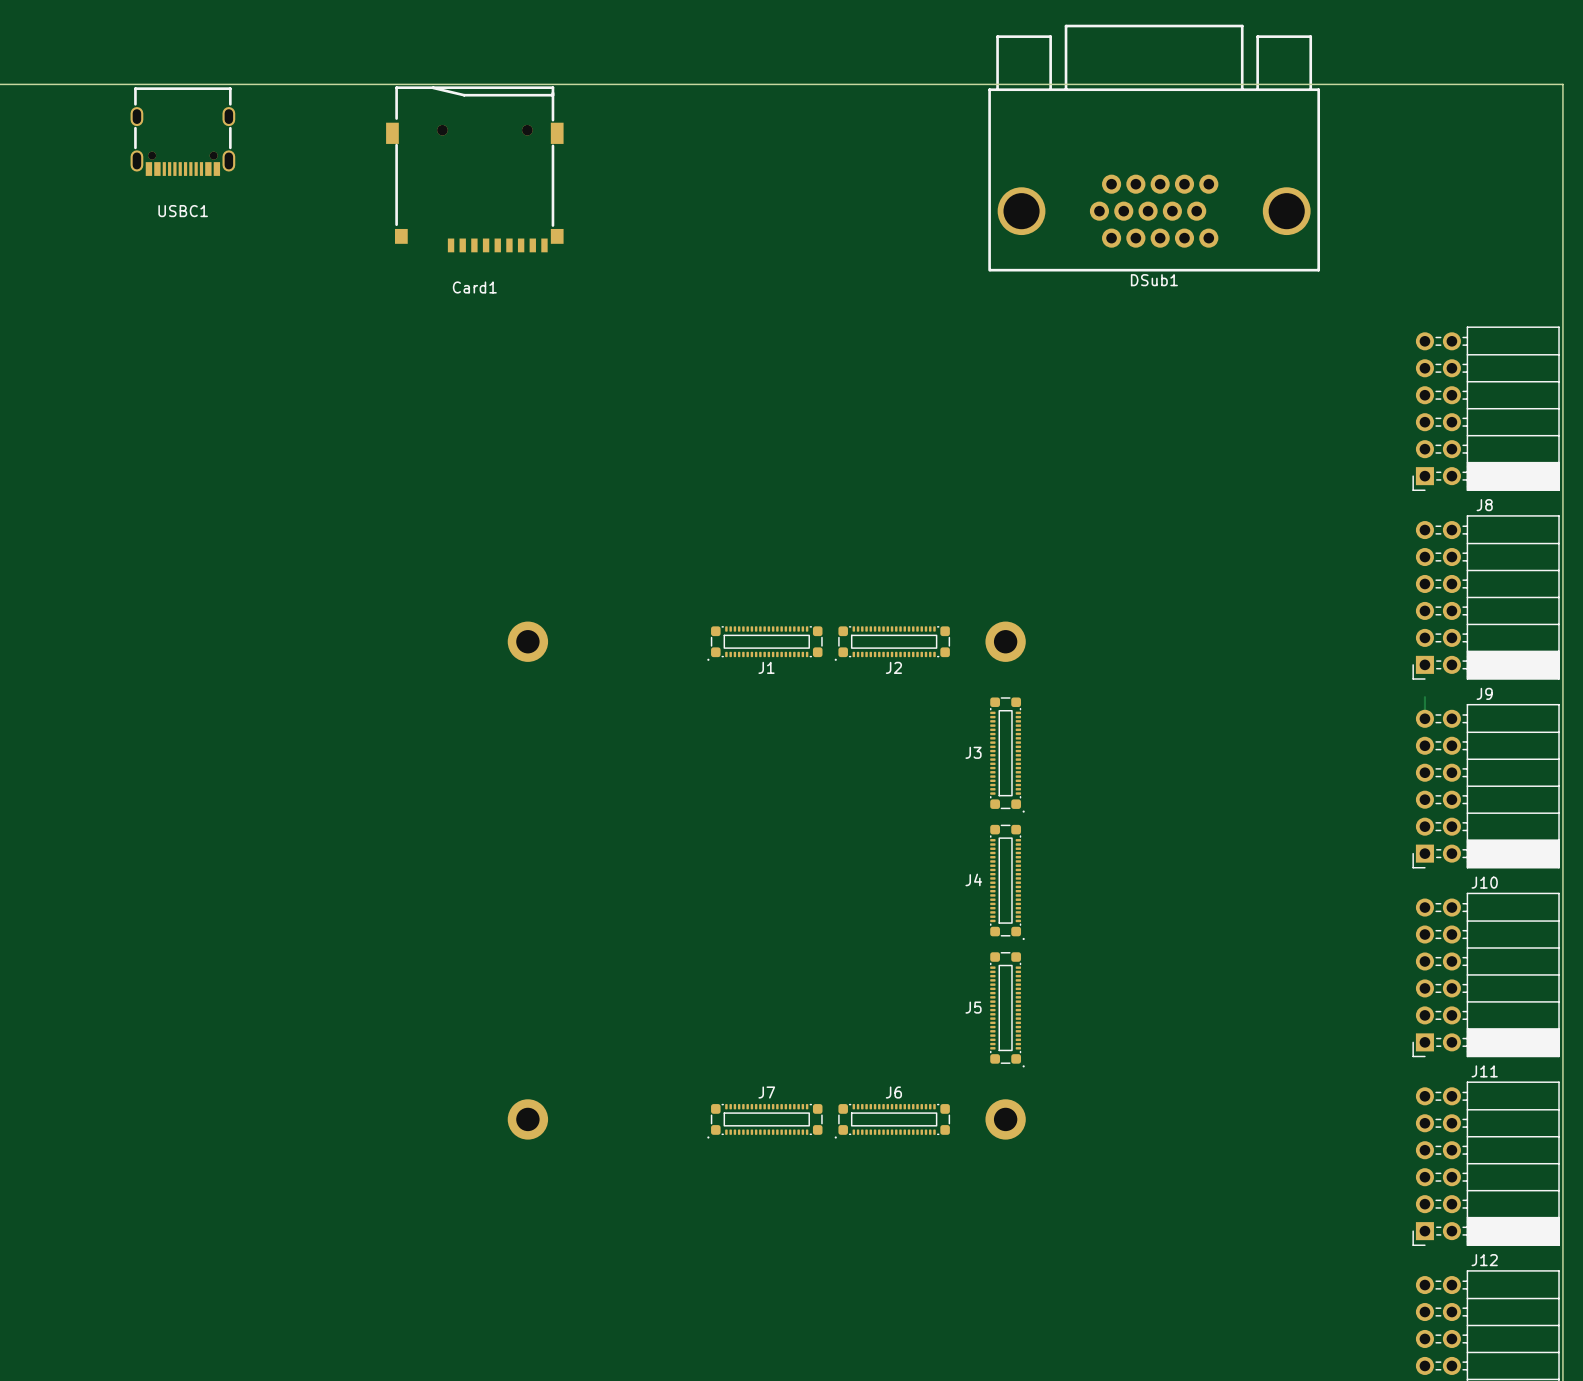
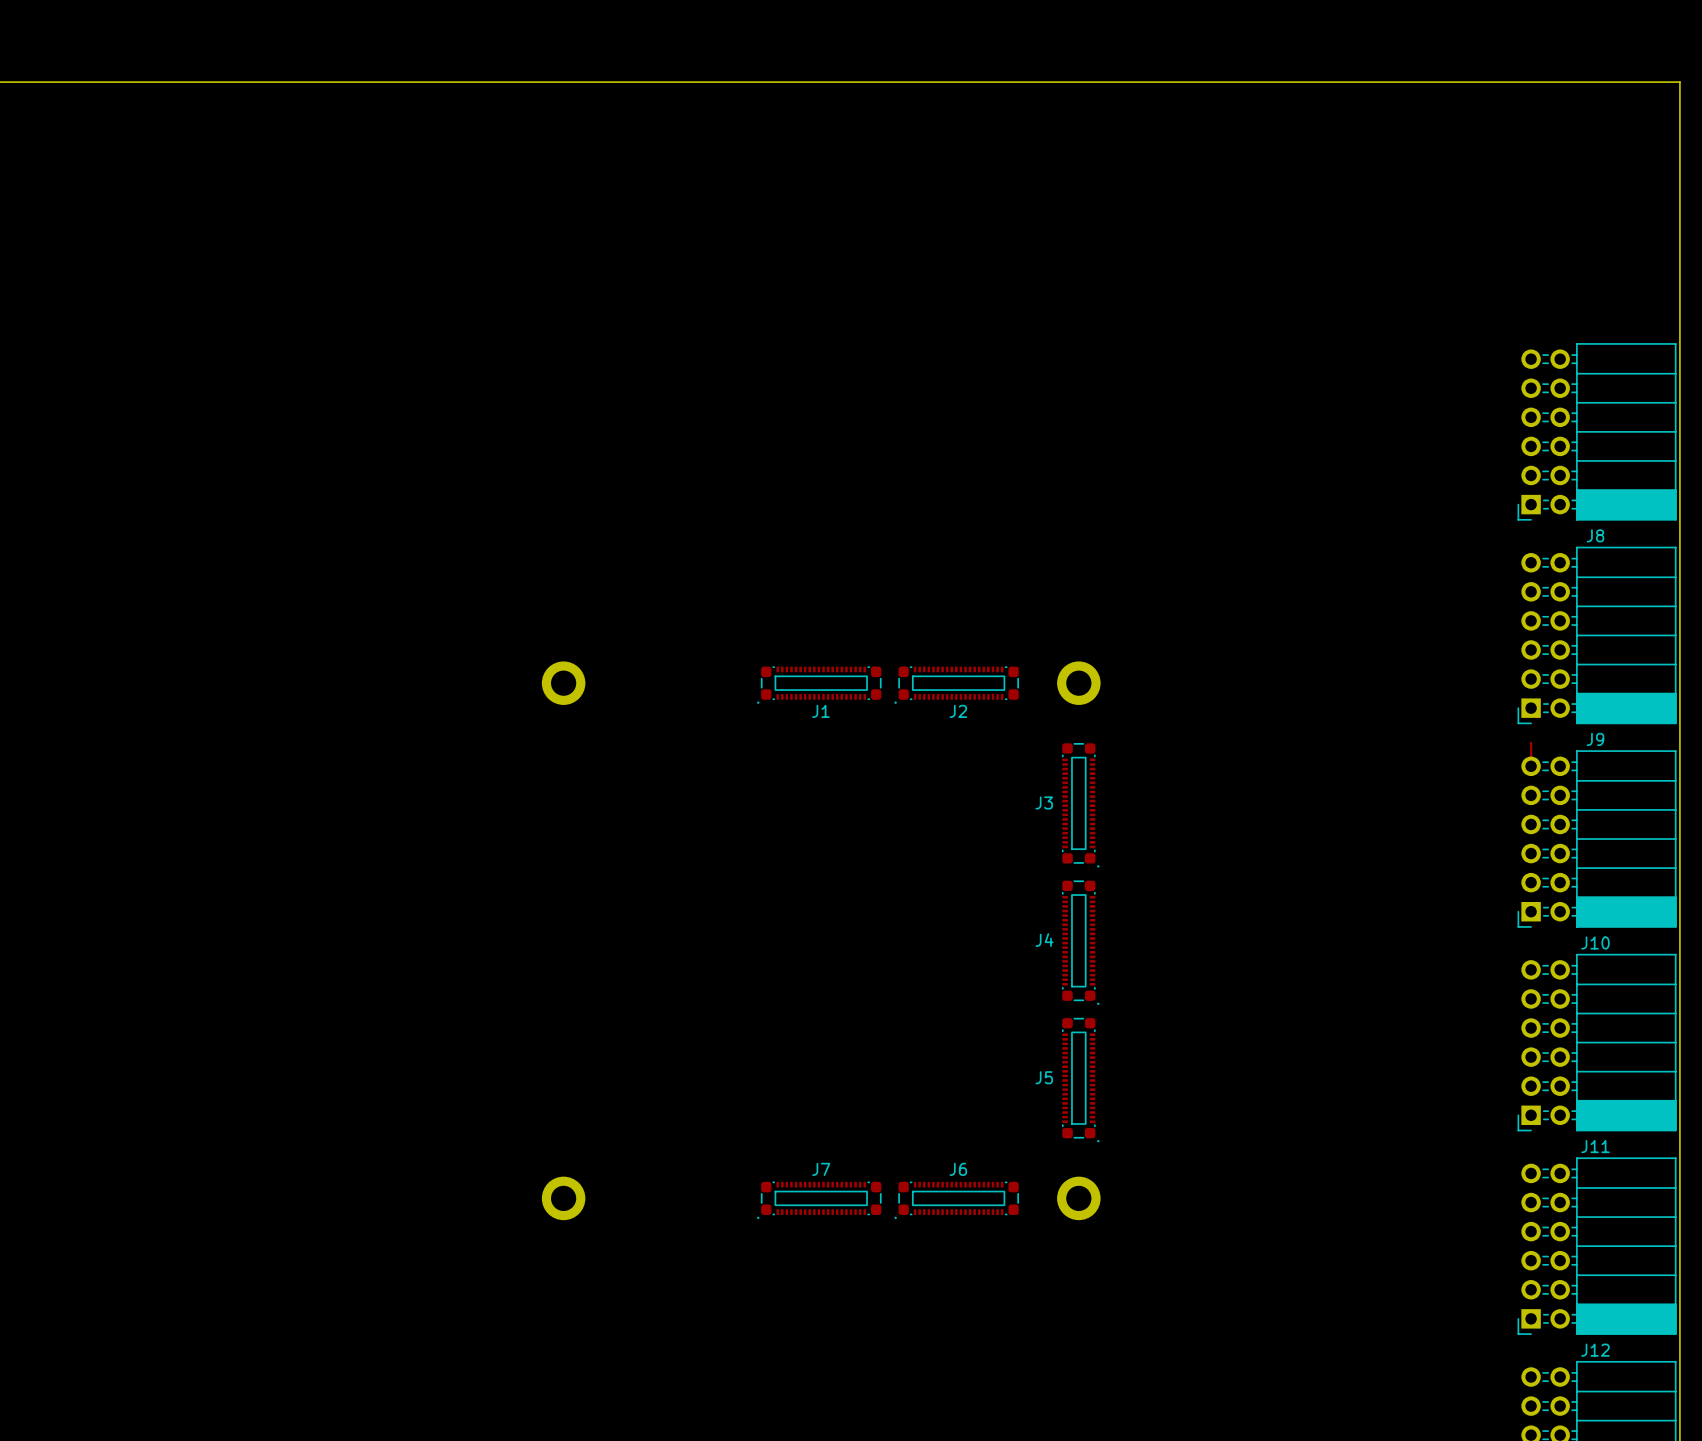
USBC1: (182, 131) -> none
DSub1: (1154, 148) -> none
Card1: (474, 169) -> none

